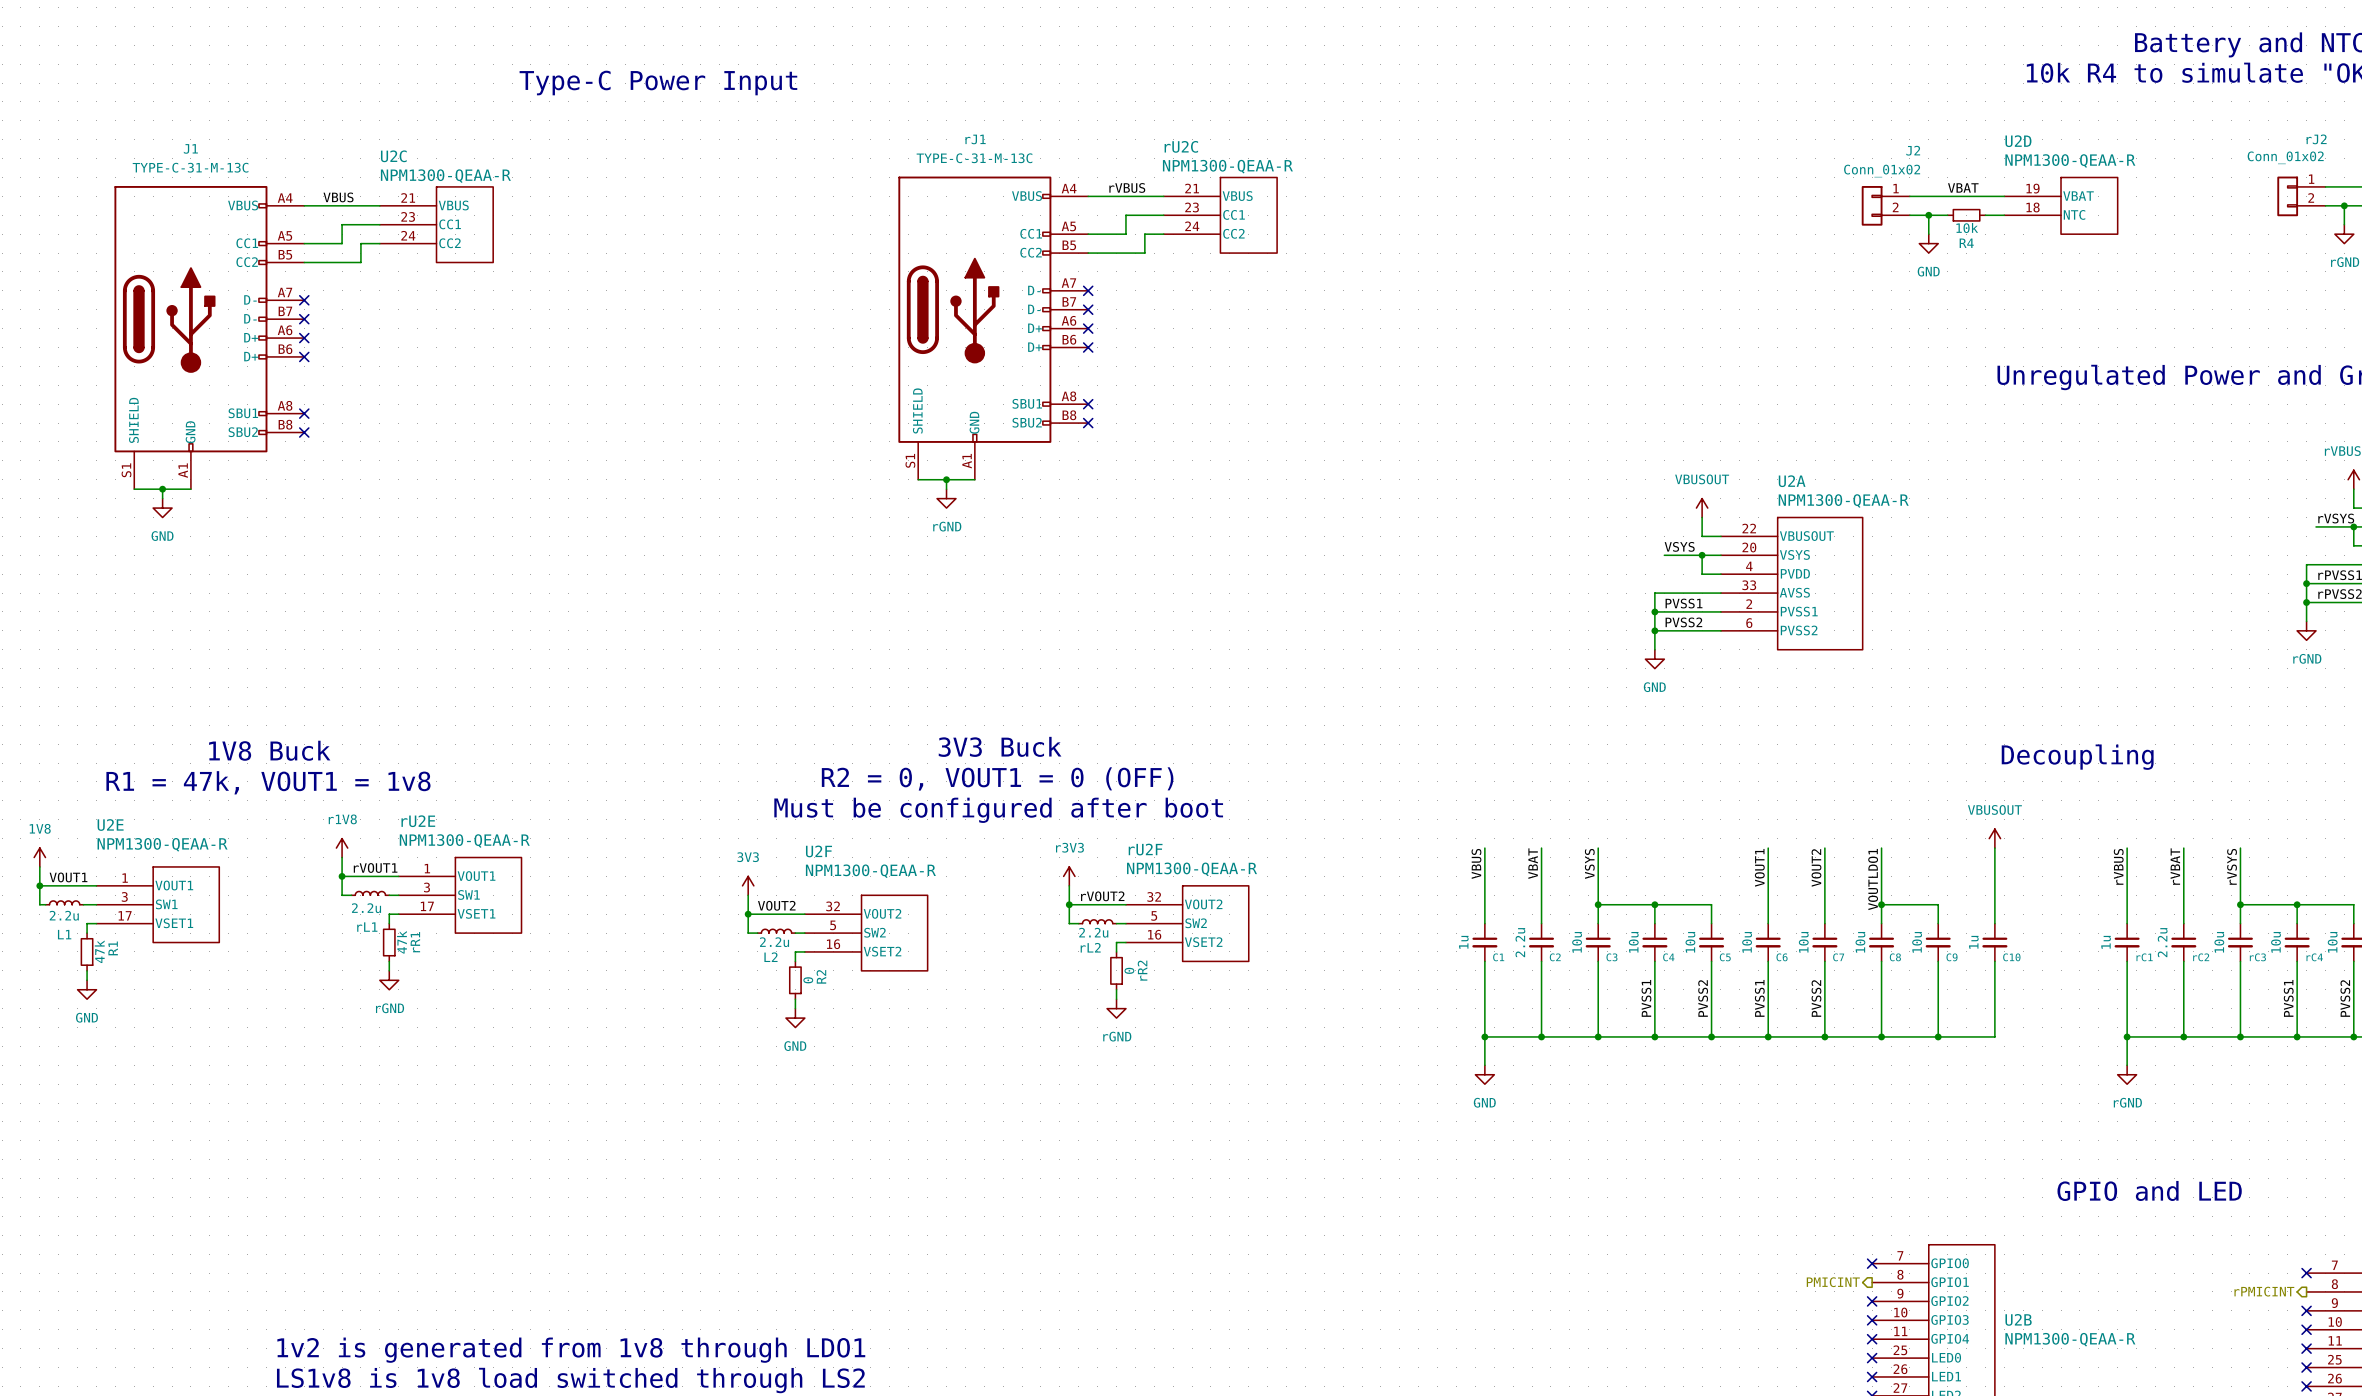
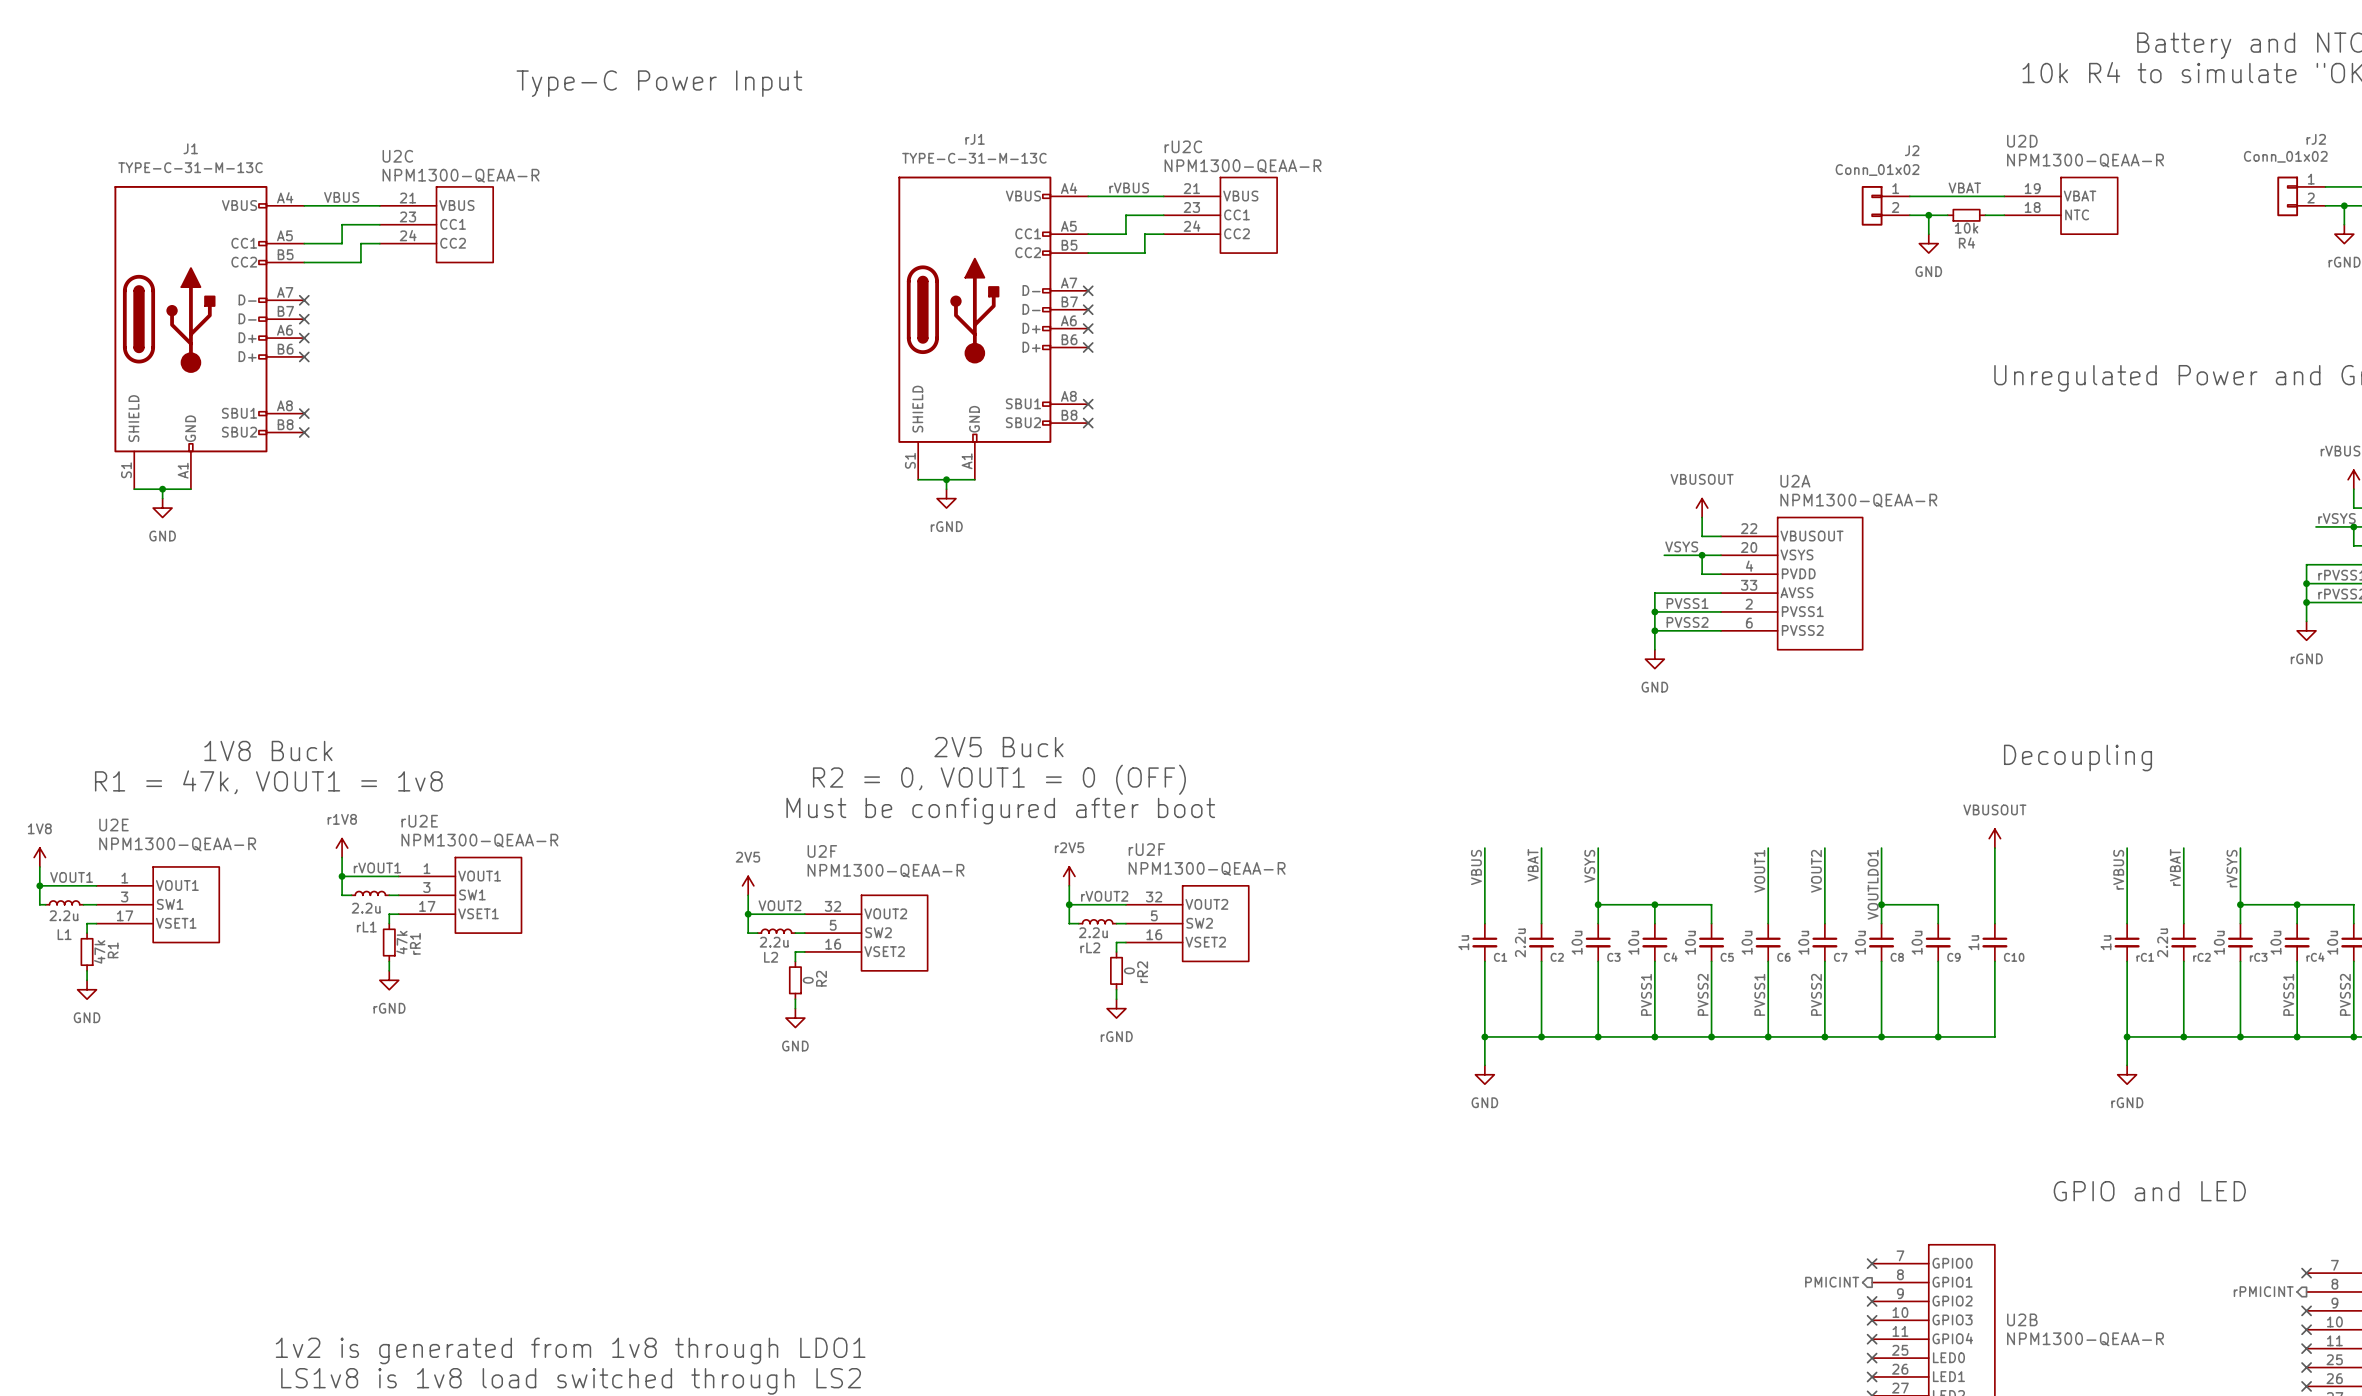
text: 3V3 Buck (1000, 746) -> 2V5 Buck (998, 747)
power symbol: r3V3 (1069, 876) -> r2V5 (1069, 876)
power symbol: 3V3 (748, 885) -> 2V5 (748, 885)

